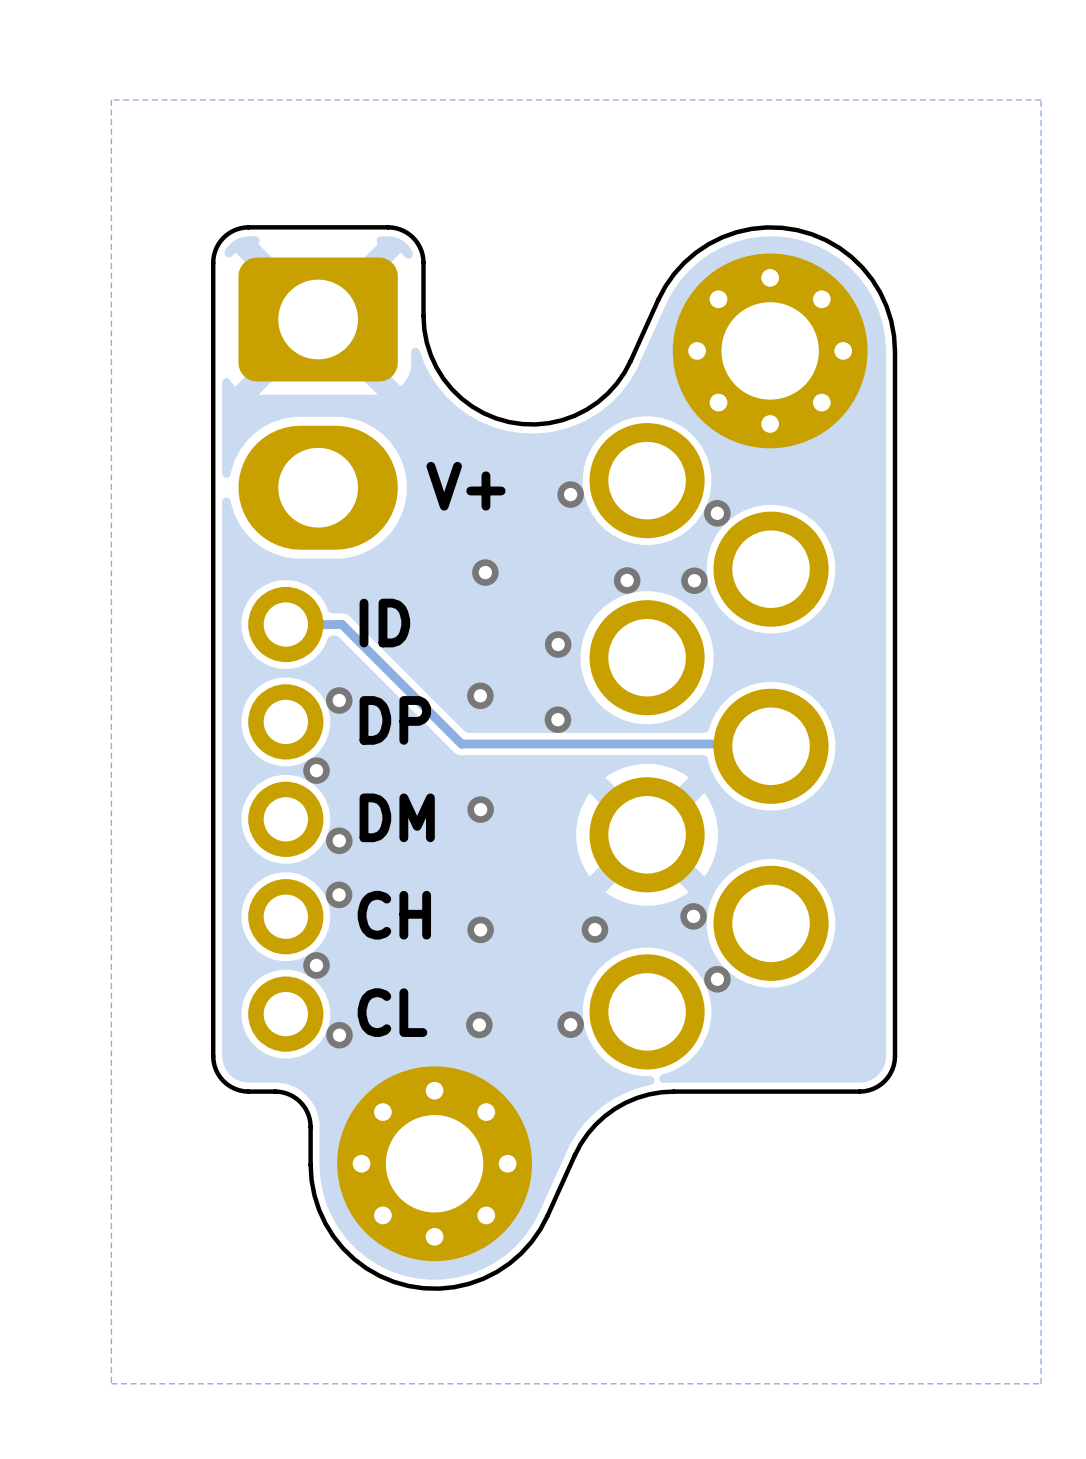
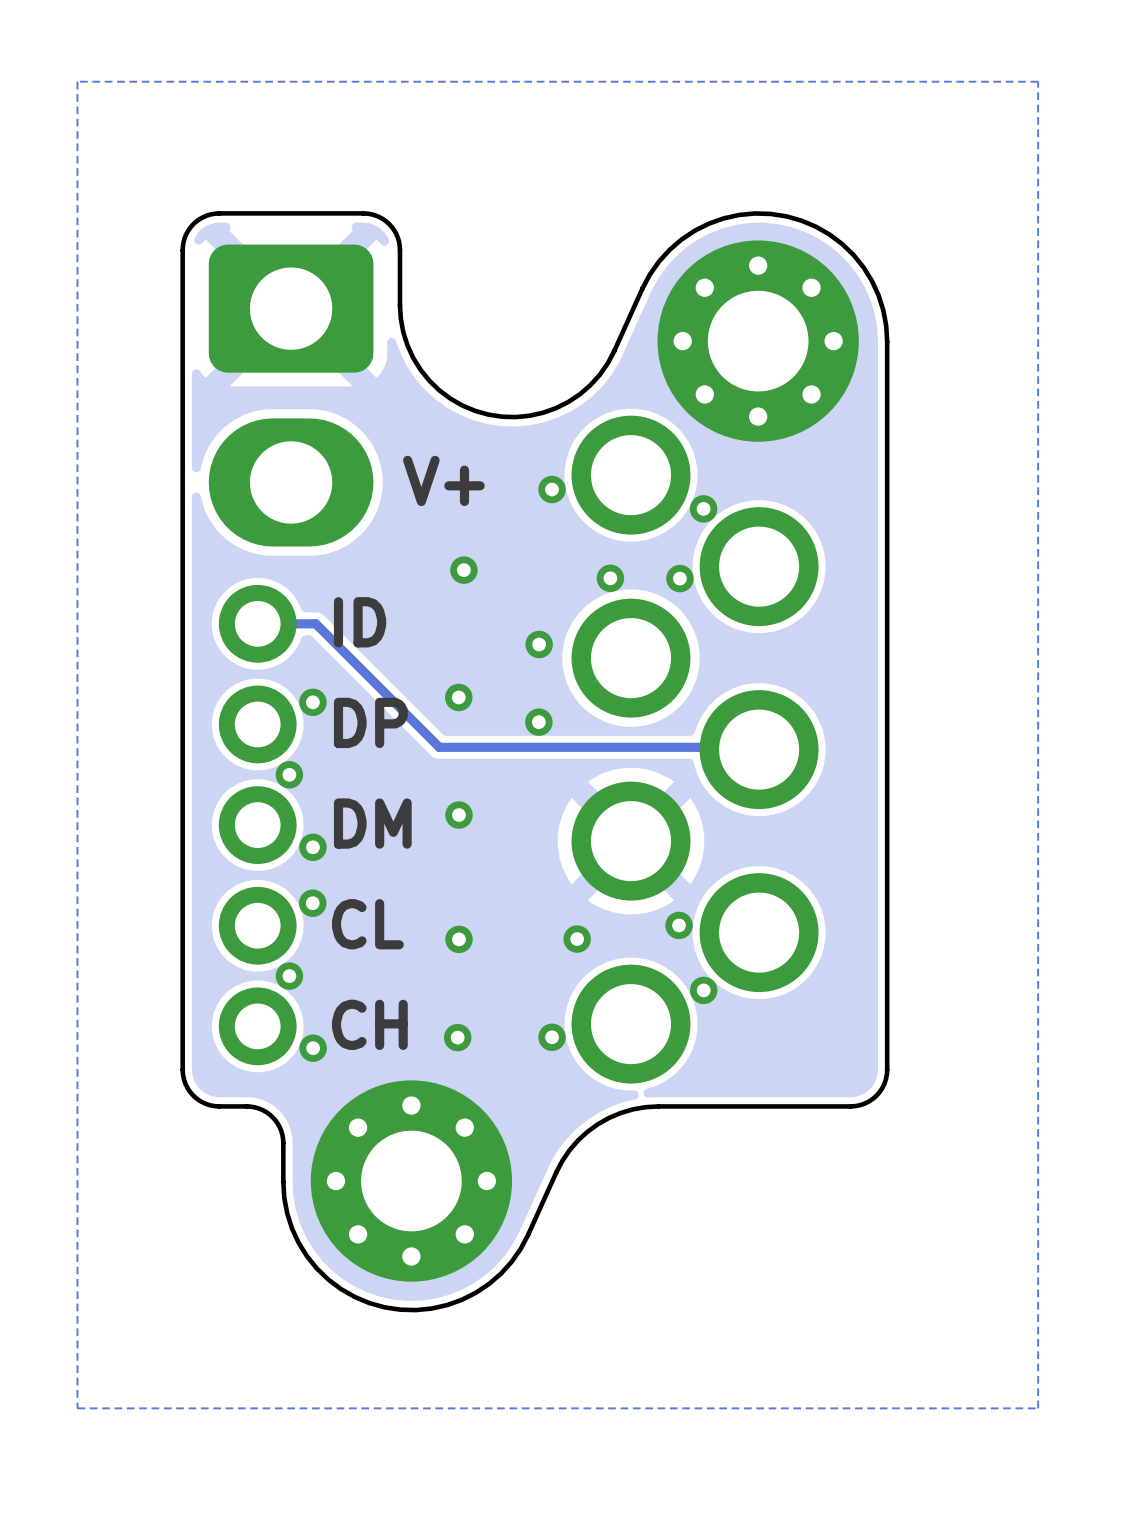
text: CH (394, 915) -> CL (367, 924)
text: CL (392, 1012) -> CH (369, 1024)

